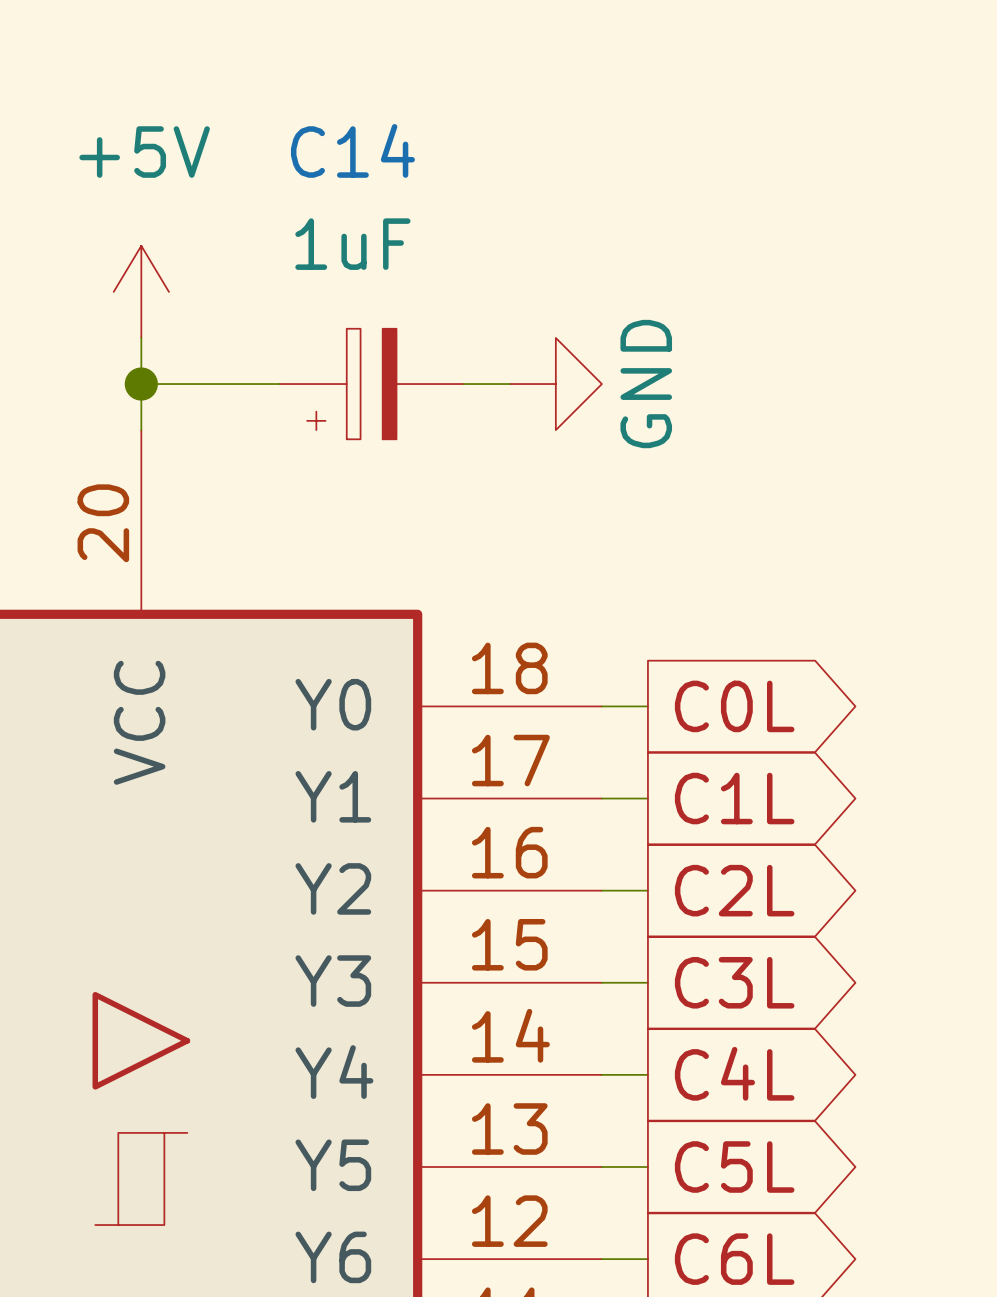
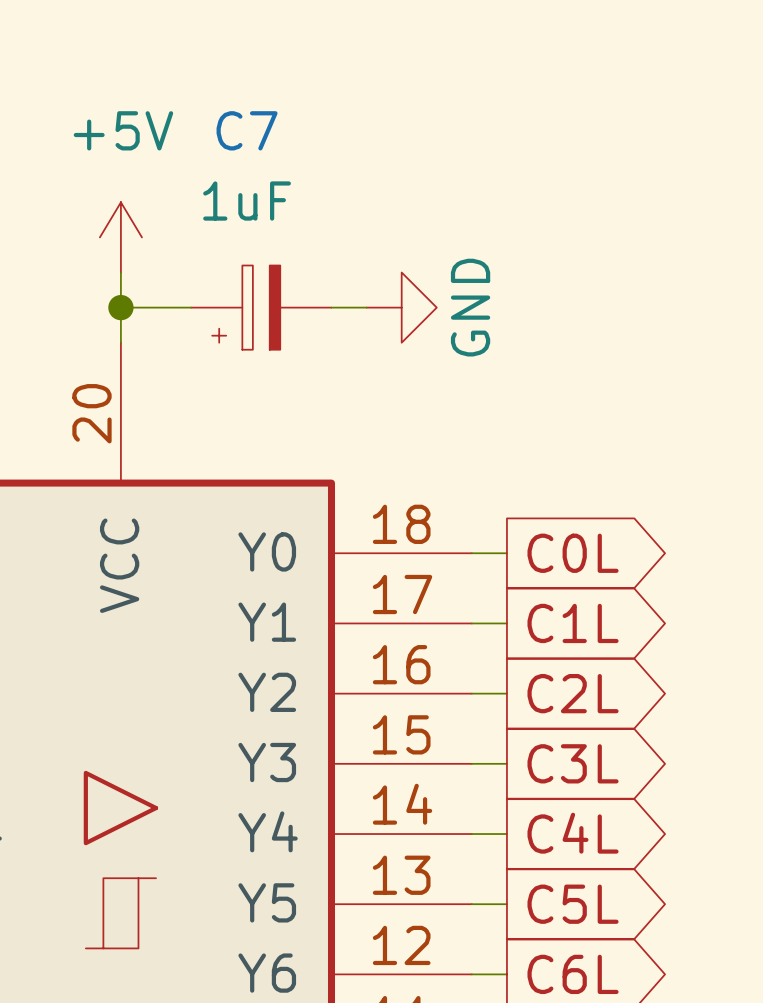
C7: none -> 1uF (261, 307)
C14: 1uF (371, 384) -> none
power symbol position: GND (555, 384) -> GND (401, 307)

